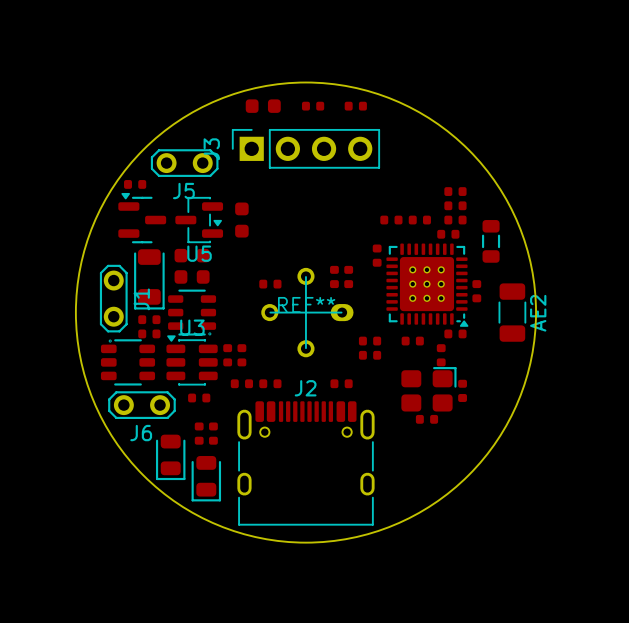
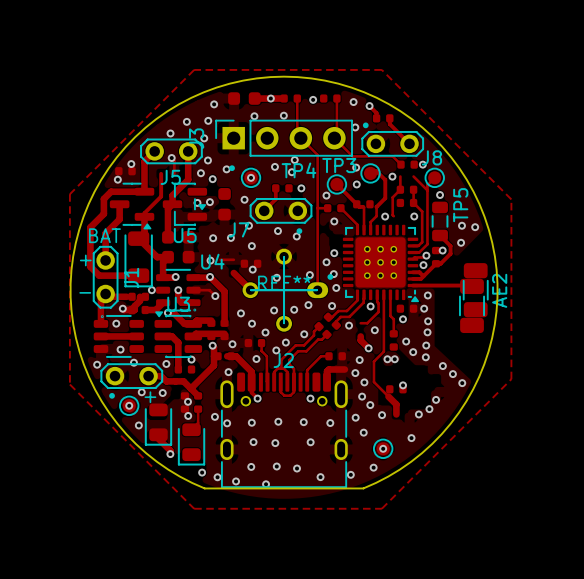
zone outline: none -> (194, 69) (69, 194) (69, 384) (194, 508) (381, 508) (511, 379) (511, 199) (381, 69) (194, 69)
round board edge: [75, 82, 537, 544] -> none
track: none -> (254, 98) (284, 98)
via: none -> (270, 98)
track: none -> (297, 98) (297, 134) (317, 154) (317, 290)
track: none -> (336, 98) (336, 135) (334, 138) (352, 156) (392, 156) (400, 164)
via: none -> (313, 99)
via: none -> (353, 102)
via: none -> (214, 104)
track: none -> (369, 106) (376, 113) (376, 118)
via: none -> (369, 106)
via: none -> (283, 115)
via: none -> (254, 116)
part: none -> (383, 118)
track: none -> (389, 118) (389, 124) (409, 143)
via: none -> (208, 120)
via: none -> (186, 121)
drawing: none -> [362, 122, 369, 129]
via: none -> (355, 127)
via: none -> (170, 133)
via: none -> (204, 138)
J8: none -> (392, 143)
track: none -> (154, 151) (144, 161) (144, 191) (111, 191) (103, 198) (103, 213) (90, 227) (90, 266) (99, 275) (138, 275)
track: none -> (188, 151) (188, 179) (172, 195) (172, 204) (168, 208) (168, 237)
track: none -> (171, 158) (174, 160) (174, 173)
via: none -> (171, 158)
via: none -> (207, 160)
via: none -> (294, 160)
via: none -> (131, 164)
part: none -> (407, 164)
via: none -> (422, 164)
drawing: none -> [229, 165, 235, 172]
via: none -> (274, 166)
via: none -> (356, 167)
via: none -> (226, 169)
track: none -> (373, 171) (376, 171) (385, 179) (385, 198) (376, 206) (376, 216) (370, 222) (370, 230)
via: none -> (291, 172)
via: none -> (200, 173)
TP3: none -> (370, 173)
track: none -> (161, 173) (161, 196) (144, 213) (144, 232) (138, 238) (157, 257) (168, 257) (163, 262) (163, 277) (175, 276)
via: none -> (392, 176)
track: none -> (400, 176) (400, 189) (392, 197) (393, 216)
track: none -> (413, 176) (427, 190)
part: none -> (251, 177)
via: none -> (251, 177)
part: (455, 191) -> none
track: none -> (434, 177) (427, 185) (427, 244) (419, 252) (412, 252)
TP5: none -> (434, 177)
via: none -> (212, 179)
via: none -> (117, 179)
track: none -> (336, 184) (359, 206) (364, 207) (364, 230)
TP4: none -> (336, 184)
via: none -> (356, 184)
track: none -> (275, 188) (275, 199) (264, 210)
part: none -> (282, 188)
via: none -> (301, 188)
part: none -> (406, 189)
track: none -> (413, 189) (413, 202) (422, 211) (422, 242) (418, 245) (412, 245)
part: (455, 205) -> none
via: none -> (326, 195)
via: none -> (440, 195)
via: none -> (244, 199)
via: none -> (209, 202)
part rotation: 0° (142, 218) -> 180° (132, 206)
via: none -> (197, 202)
part: none -> (406, 202)
track: none -> (119, 204) (119, 219) (105, 233) (105, 260)
part: (419, 220) -> none
part: (455, 220) -> none
track: none -> (317, 208) (327, 208)
part: none -> (334, 208)
track: none -> (340, 208) (357, 224) (357, 230)
J7: none -> (281, 210)
via: none -> (385, 216)
via: none -> (414, 216)
part: (448, 234) -> none
via: none -> (334, 221)
part position: (491, 241) -> (440, 221)
via: none -> (249, 225)
via: none -> (461, 225)
via: none -> (475, 227)
drawing: none -> [296, 228, 303, 234]
via: none -> (277, 231)
text: none -> BAT (104, 235)
track: none -> (440, 235) (450, 246) (450, 253) (440, 263) (436, 263) (420, 278) (412, 278)
via: none -> (296, 236)
part: (377, 255) -> none
via: none -> (213, 238)
via: none -> (230, 237)
via: none -> (461, 242)
via: none -> (251, 246)
via: none -> (442, 250)
via: none -> (334, 253)
track: none -> (426, 255) (412, 259)
via: none -> (426, 255)
drawing: none -> [250, 256, 334, 324]
part: (334, 276) -> none
part: (348, 276) -> none
track: none -> (220, 259) (233, 259)
text: none -> + (85, 260)
via: none -> (210, 260)
U4 name: none -> U4 (212, 261)
via: none -> (326, 262)
part position: (427, 285) -> (380, 263)
via: none -> (423, 265)
via: none -> (252, 269)
part position: (476, 291) -> (436, 257)
track: none -> (412, 272) (419, 272) (423, 276)
track: none -> (233, 273) (250, 290)
via: none -> (333, 274)
via: none -> (309, 275)
via: none -> (175, 276)
via: none -> (210, 276)
track: none -> (193, 277) (210, 276) (224, 291) (224, 320)
via: none -> (276, 277)
track: none -> (412, 285) (470, 285) (474, 289)
via: none -> (336, 287)
via: none -> (151, 290)
track: none -> (178, 290) (178, 299) (181, 302) (193, 302)
via: none -> (178, 290)
track: none -> (193, 290) (209, 290) (215, 296)
text: none -> - (85, 292)
track: none -> (357, 294) (357, 300) (346, 311) (338, 311) (332, 317) (328, 317)
track: none -> (364, 294) (363, 302) (349, 316) (340, 316) (336, 321) (336, 325)
track: none -> (377, 294) (378, 312) (367, 323) (360, 323)
track: none -> (383, 294) (383, 351) (373, 361) (373, 382) (396, 404) (396, 414)
track: none -> (390, 294) (390, 315) (393, 319) (393, 333)
via: none -> (215, 296)
via: none -> (427, 295)
track: none -> (126, 296) (108, 296) (105, 294) (101, 298) (101, 323)
track: none -> (139, 296) (139, 300) (134, 306) (134, 310) (122, 308)
track: none -> (163, 302) (155, 310) (147, 310)
via: none -> (308, 305)
via: none -> (332, 306)
part: none -> (472, 305)
via: none -> (370, 306)
via: none -> (122, 308)
part: none -> (406, 308)
via: none -> (424, 308)
via: none -> (294, 309)
part: (455, 333) -> none
via: none -> (274, 310)
track: none -> (167, 312) (173, 312) (184, 323) (193, 323) (196, 320) (211, 320)
via: none -> (167, 312)
via: none -> (240, 313)
part: (370, 341) -> none
part: (412, 341) -> none
via: none -> (403, 319)
part: none -> (323, 321)
via: none -> (428, 321)
via: none -> (116, 323)
via: none -> (252, 323)
via: none -> (349, 325)
track: none -> (319, 326) (313, 331) (313, 335) (303, 345) (295, 345) (281, 359) (281, 368)
part: none -> (331, 329)
part: (370, 355) -> none
via: none -> (374, 330)
part: (441, 355) -> none
via: none -> (427, 332)
via: none -> (265, 332)
track: none -> (224, 333) (196, 333) (193, 336)
via: none -> (304, 334)
track: none -> (326, 334) (321, 339) (318, 339) (306, 351) (298, 351) (289, 360) (289, 364) (293, 368) (293, 392) (290, 395) (284, 395) (280, 392) (280, 382)
track: none -> (101, 336) (136, 336)
track: none -> (163, 336) (172, 336) (178, 342) (178, 369)
track: none -> (360, 336) (360, 340) (368, 348)
part: none -> (393, 340)
via: none -> (406, 341)
track: none -> (261, 343) (261, 350) (266, 356) (267, 382)
via: none -> (285, 342)
via: none -> (232, 344)
track: none -> (212, 345) (214, 365) (190, 388)
via: none -> (212, 345)
via: none -> (426, 345)
via: none -> (368, 348)
via: none -> (120, 349)
via: none -> (276, 350)
via: none -> (413, 352)
track: none -> (227, 356) (236, 356) (251, 371) (251, 392) (257, 398)
part position: (270, 383) -> (254, 343)
part: (341, 383) -> none
track: none -> (329, 356) (321, 356) (307, 370) (307, 382)
part: none -> (335, 356)
via: none -> (425, 357)
via: none -> (256, 359)
via: none -> (387, 359)
via: none -> (394, 359)
via: none -> (191, 359)
via: none -> (359, 360)
part: (428, 389) -> none
via: none -> (133, 362)
part: (462, 390) -> none
via: none -> (97, 364)
via: none -> (166, 363)
via: none -> (442, 366)
track: none -> (344, 369) (329, 369) (327, 371) (327, 382)
via: none -> (228, 372)
via: none -> (355, 373)
via: none -> (452, 374)
track: none -> (148, 376) (161, 376) (166, 381) (183, 381) (198, 395)
track: none -> (274, 382) (274, 372) (277, 368) (283, 368) (287, 372) (287, 382)
via: none -> (364, 382)
via: none -> (462, 383)
via: none -> (403, 385)
via: none -> (141, 392)
drawing: none -> [109, 392, 115, 399]
via: none -> (162, 393)
text: none -> + (150, 397)
via: none -> (362, 396)
via: none -> (257, 398)
via: none -> (310, 398)
via: none -> (436, 399)
via: none -> (188, 401)
J6 name: J6 (141, 433) -> none
via: none -> (370, 405)
part: none -> (129, 405)
via: none -> (129, 405)
track: none -> (198, 409) (198, 423) (191, 429)
via: none -> (429, 409)
via: none -> (418, 414)
via: none -> (382, 415)
via: none -> (188, 415)
via: none -> (214, 416)
via: none -> (355, 417)
via: none -> (278, 421)
via: none -> (303, 422)
via: none -> (227, 423)
via: none -> (251, 422)
via: none -> (330, 423)
via: none -> (138, 425)
via: none -> (363, 432)
track: none -> (157, 437) (170, 450) (170, 454)
via: none -> (411, 438)
via: none -> (253, 442)
via: none -> (310, 442)
via: none -> (275, 443)
part: none -> (383, 448)
via: none -> (383, 448)
via: none -> (170, 454)
via: none -> (251, 466)
via: none -> (276, 466)
via: none -> (373, 467)
via: none -> (297, 468)
via: none -> (202, 472)
via: none -> (350, 474)
via: none -> (320, 477)
via: none -> (217, 477)
via: none -> (236, 481)
via: none -> (266, 484)
board edge: none -> (204, 488) (363, 488) (376, 482) (411, 461) (441, 434) (466, 401) (484, 364) (494, 324) (497, 283) (492, 242) (479, 204) (459, 168) (432, 136) (400, 111) (364, 92) (324, 80) (283, 76) (243, 80) (203, 92) (167, 111) (135, 137) (108, 168) (88, 204) (75, 243) (70, 283) (73, 324) (79, 351) (89, 377) (109, 412) (136, 444) (168, 469) (204, 488)

